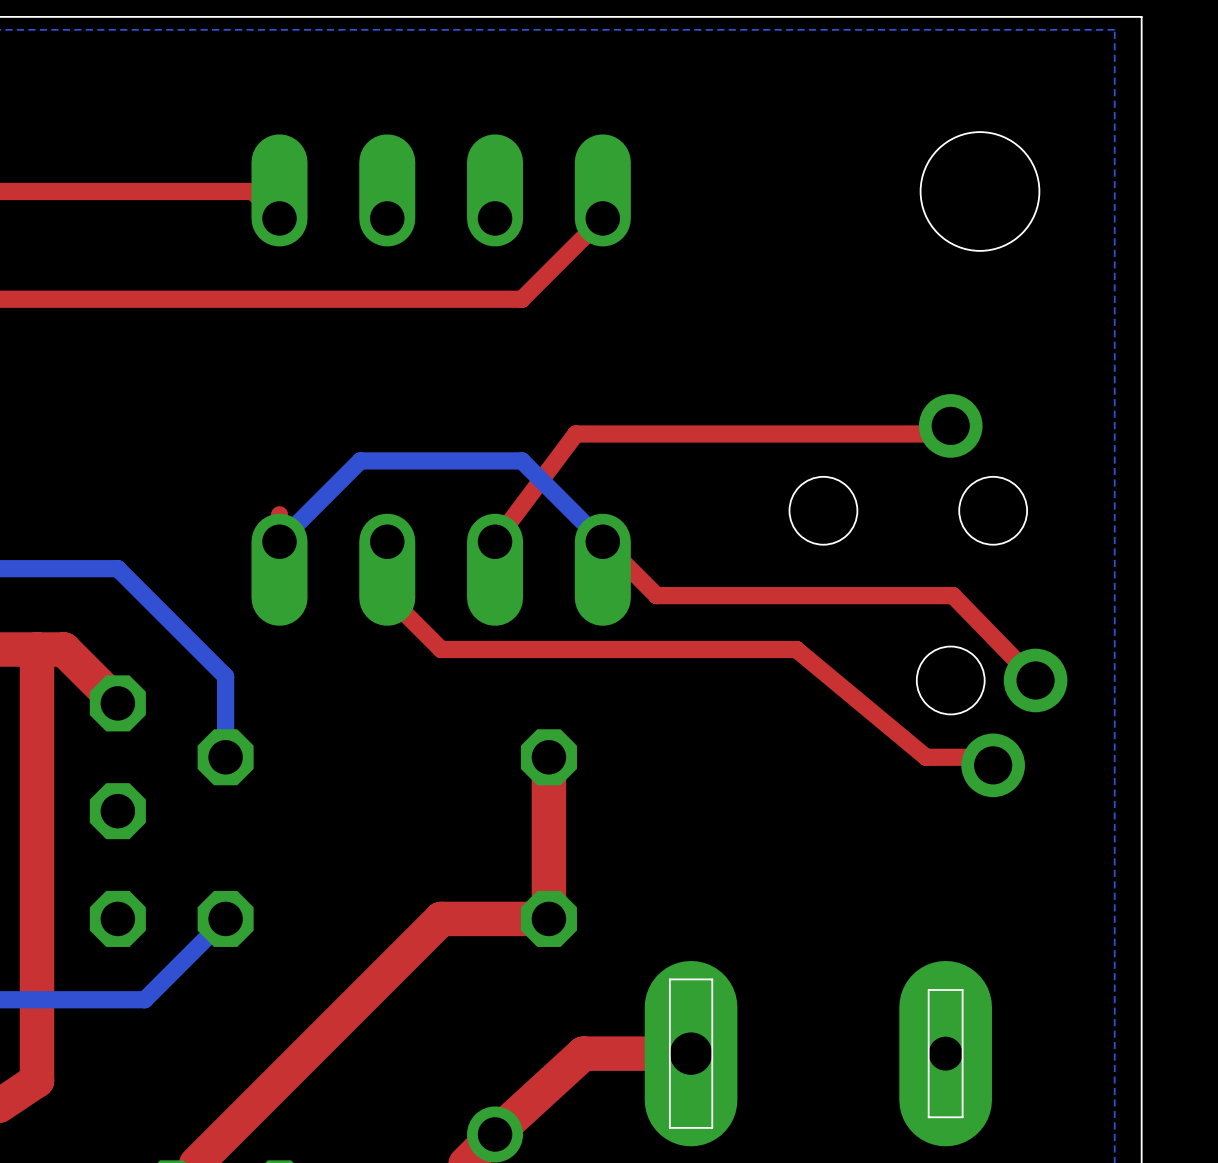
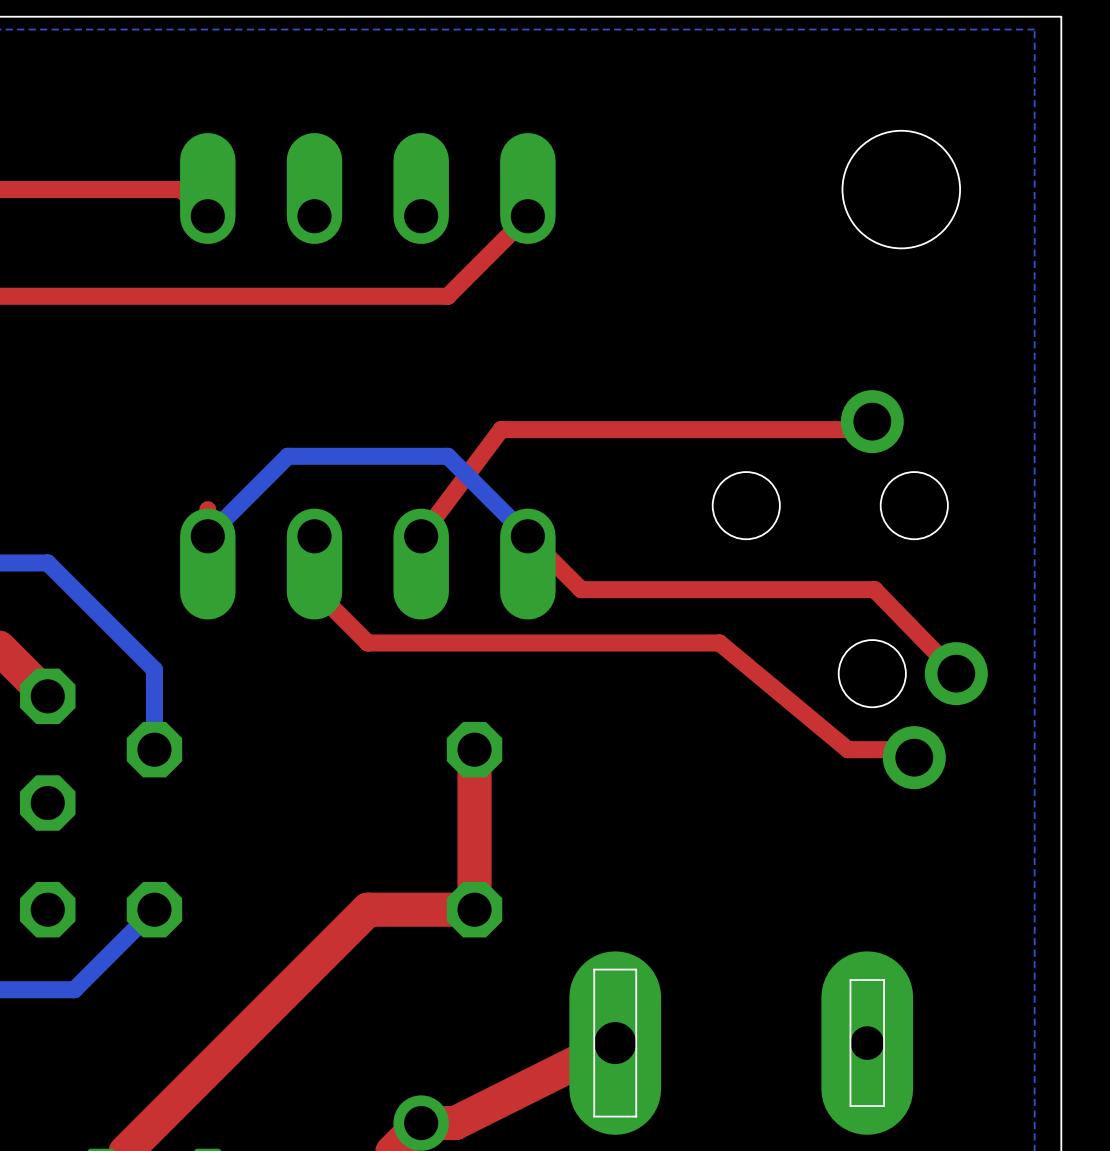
top track: (691, 1053) (583, 1053) (495, 1134) -> (615, 1043) (455, 1123) (421, 1123)

